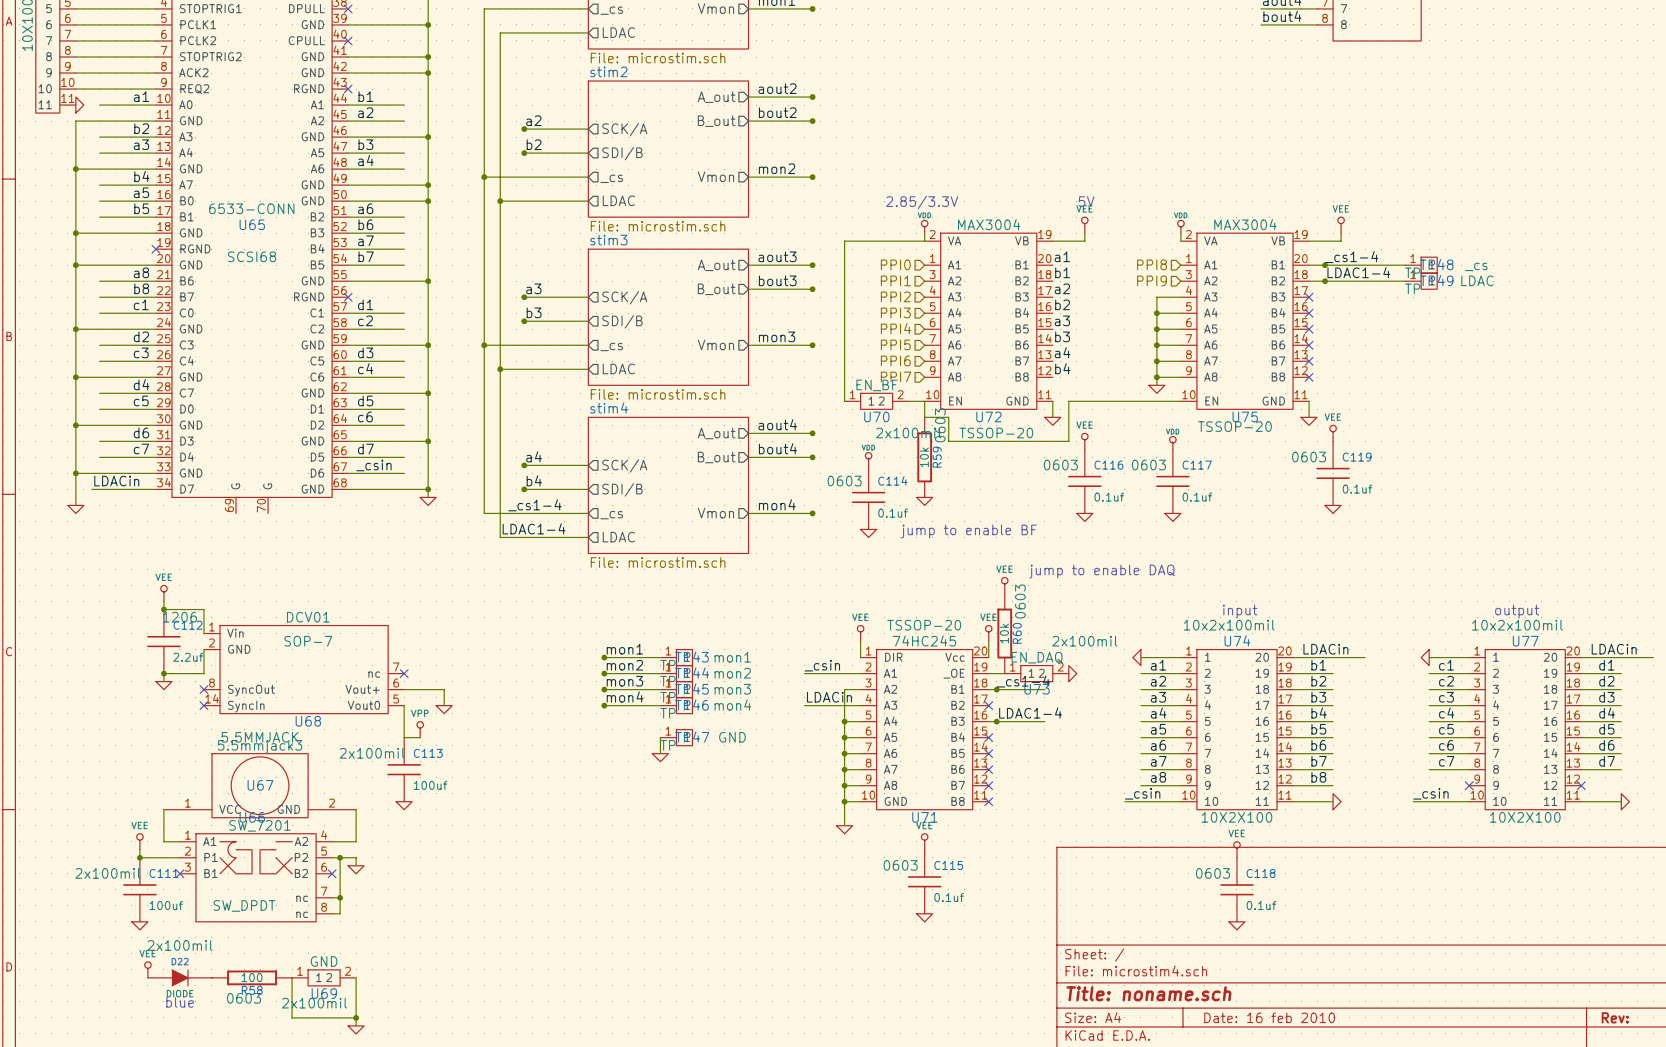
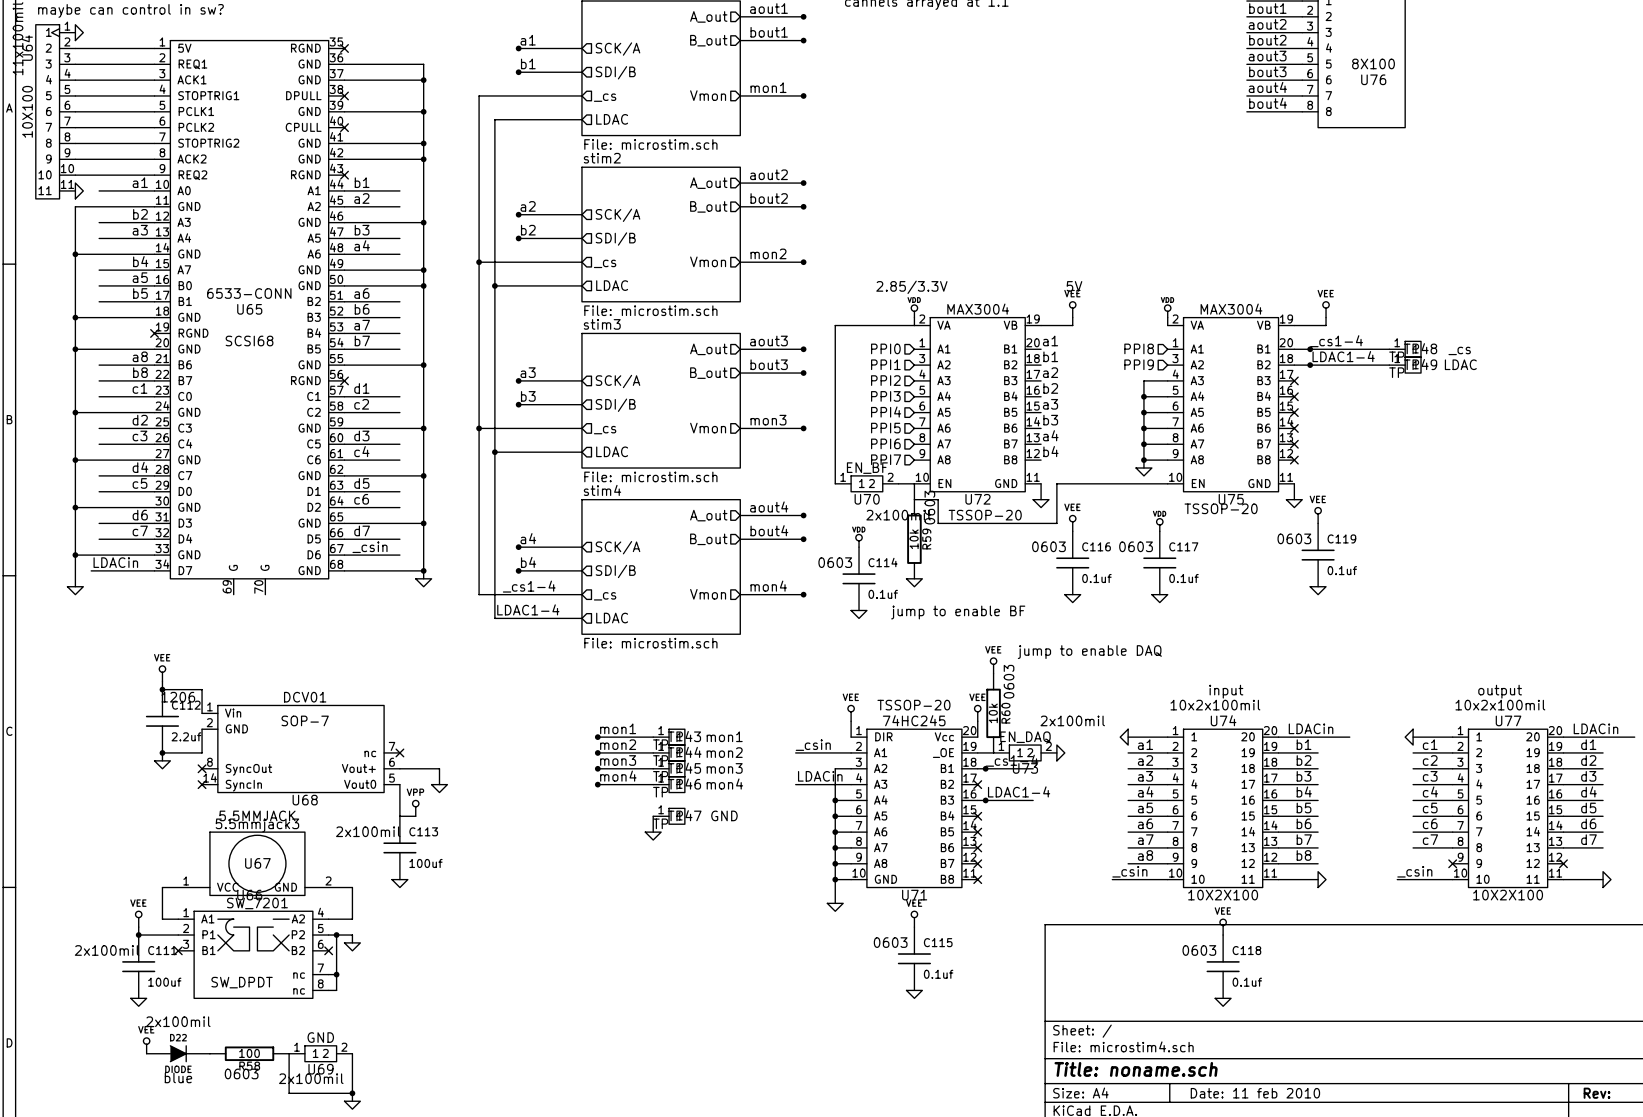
title block: Date: 16 feb 2010 (1269, 1017) -> Date: 11 feb 2010 (1255, 1093)

